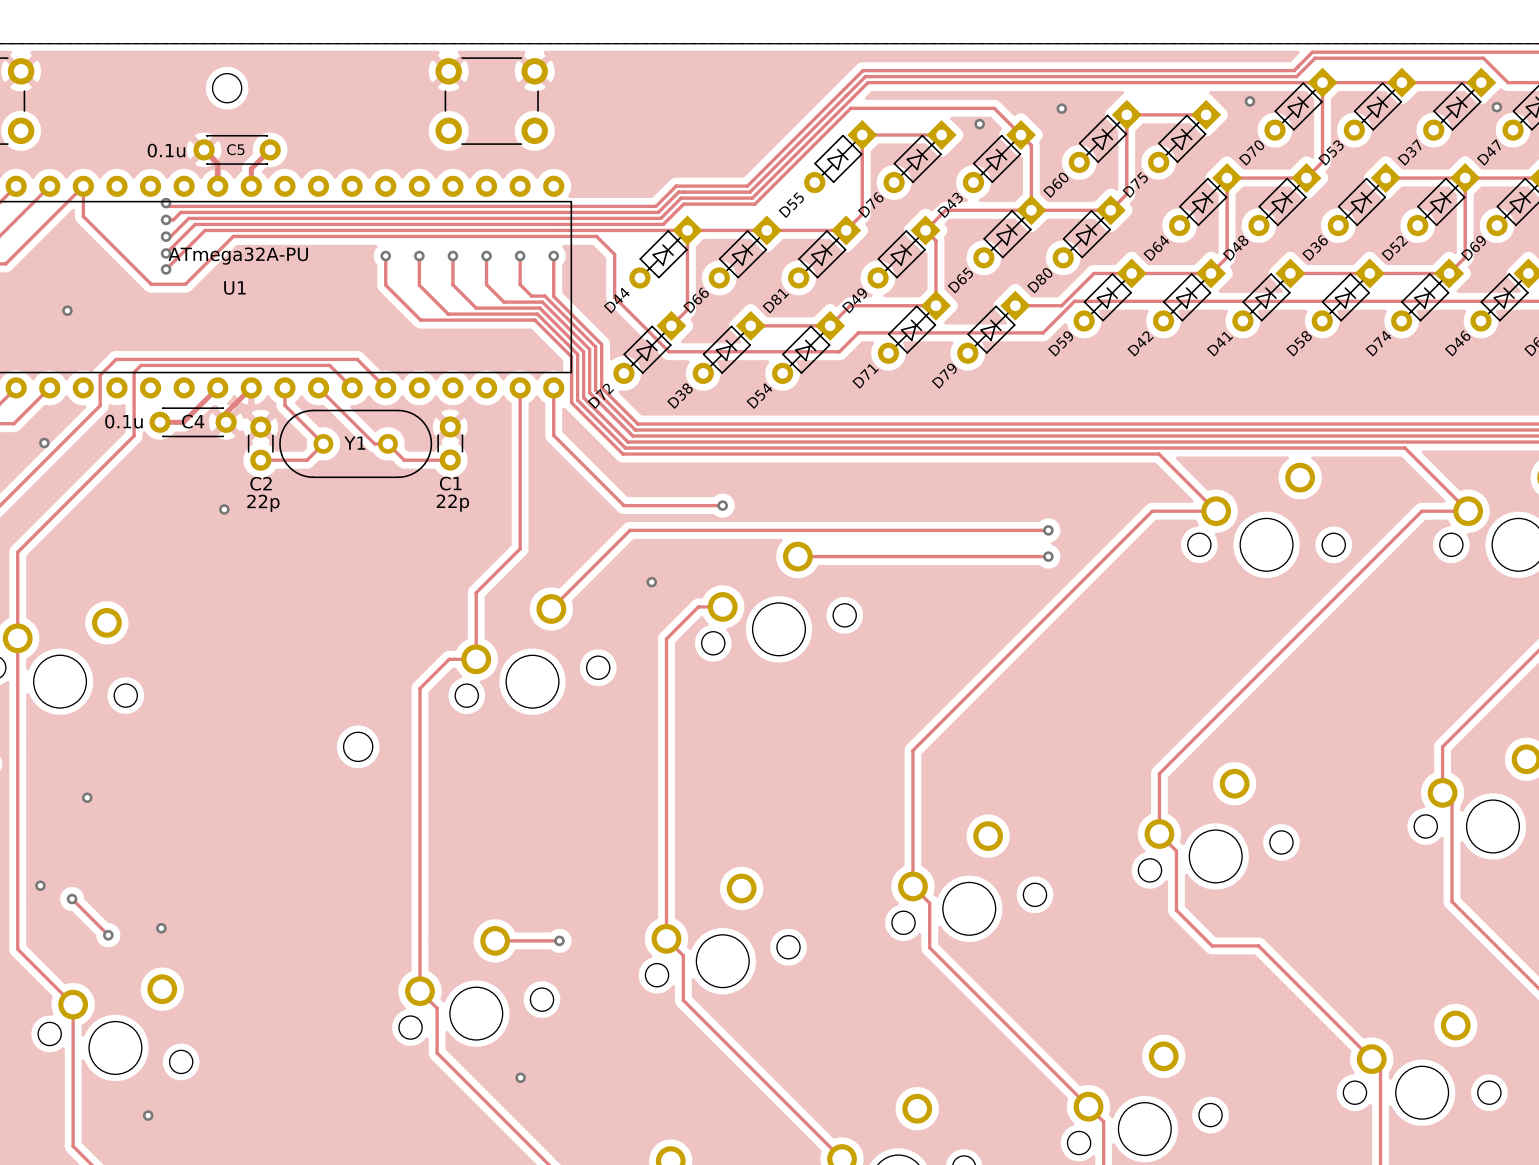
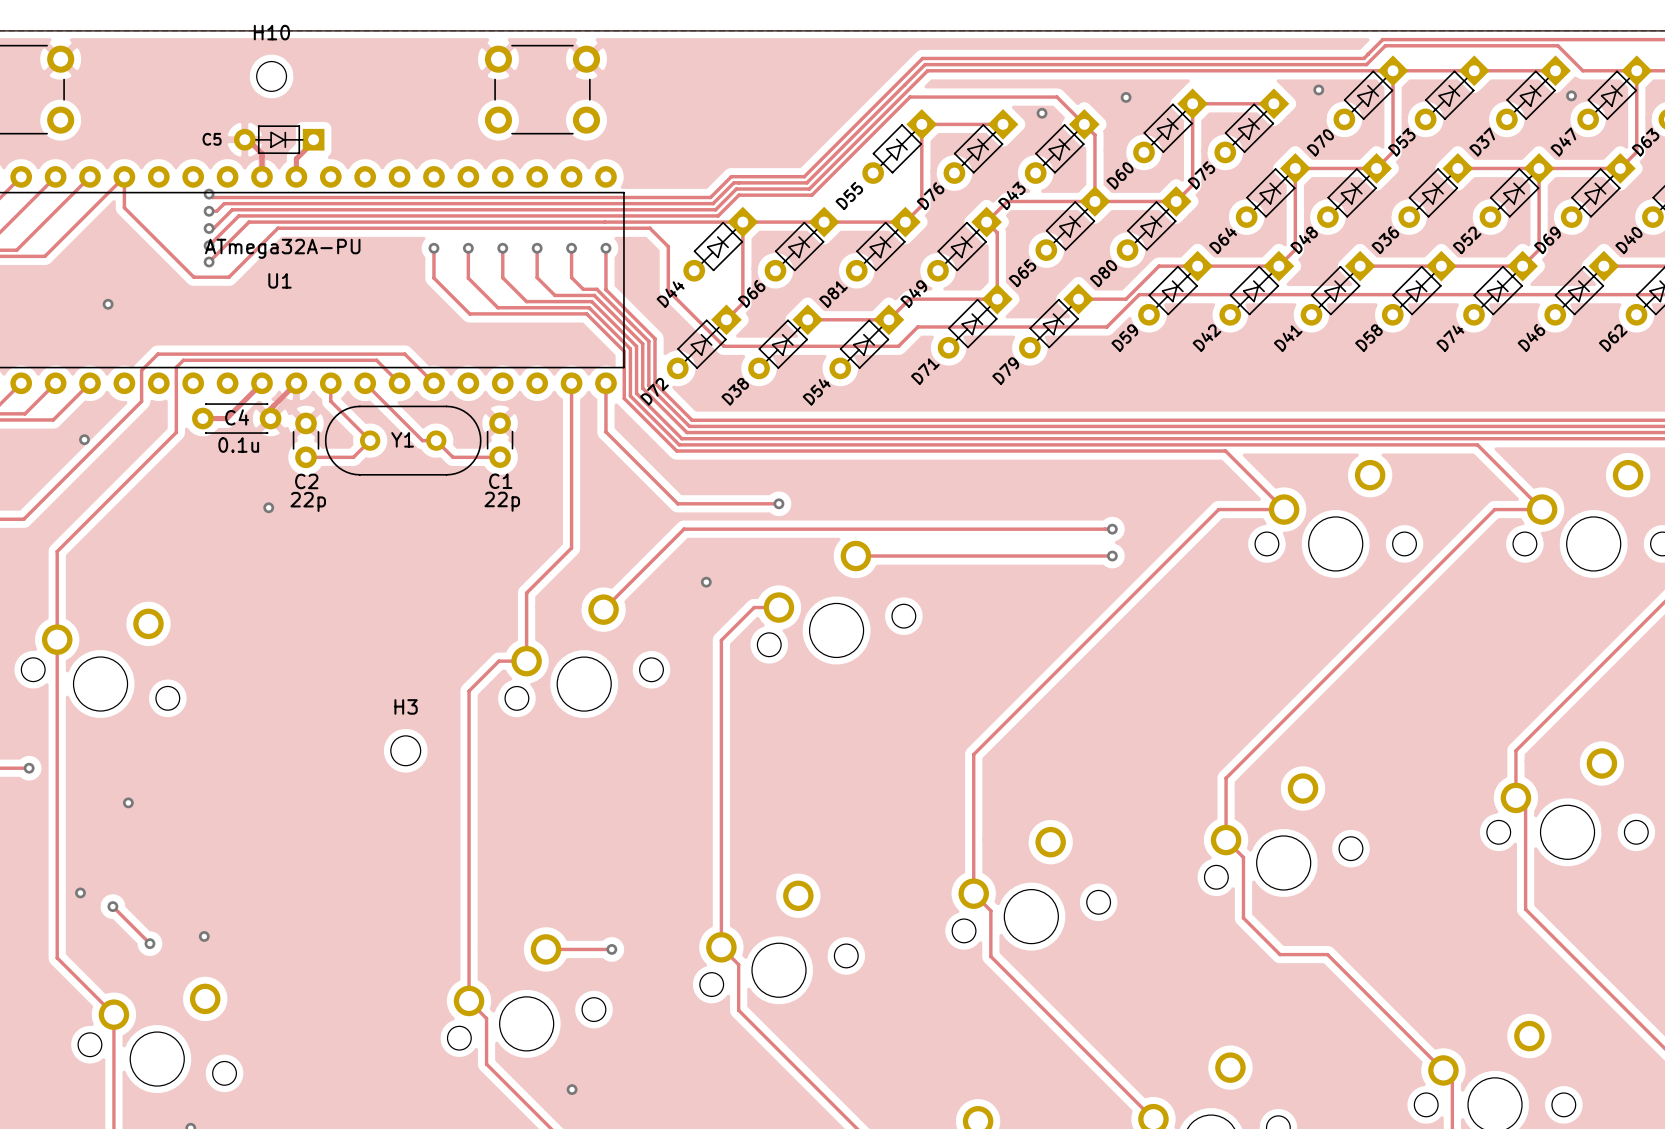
H10 name: none -> H10 (271, 32)
C5 footprint: [193, 134, 281, 165] -> [233, 125, 325, 155]
C5 name position: C5 (235, 149) -> C5 (212, 139)
C5 value: 0.1u (166, 150) -> none
C4 value position: 0.1u (123, 421) -> 0.1u (238, 445)
H3 name: none -> H3 (406, 706)

